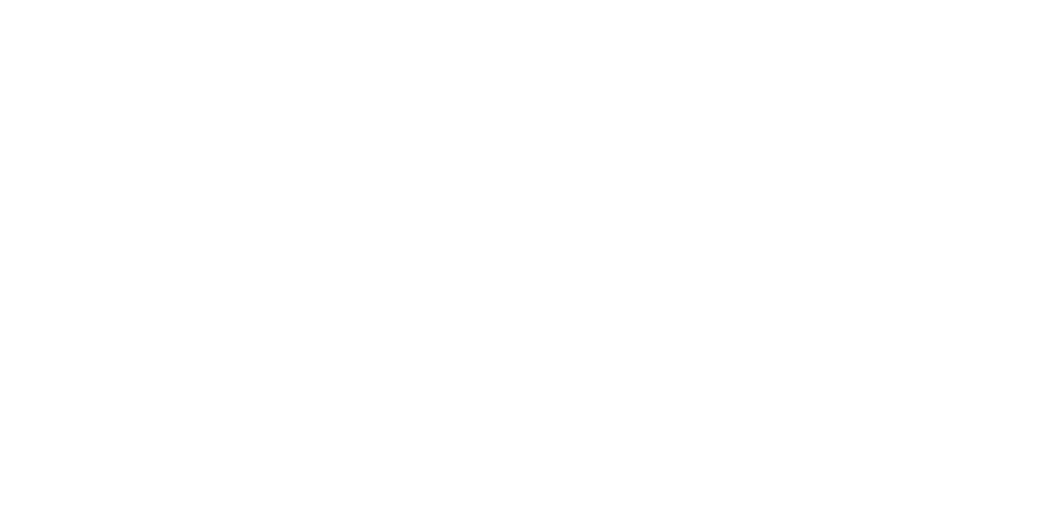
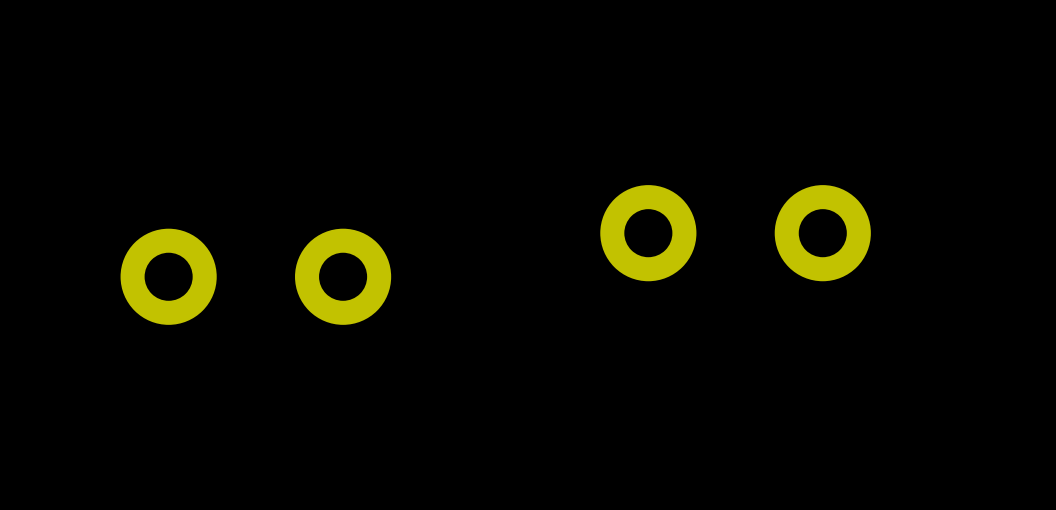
part: none -> (735, 233)
part: none -> (255, 276)

